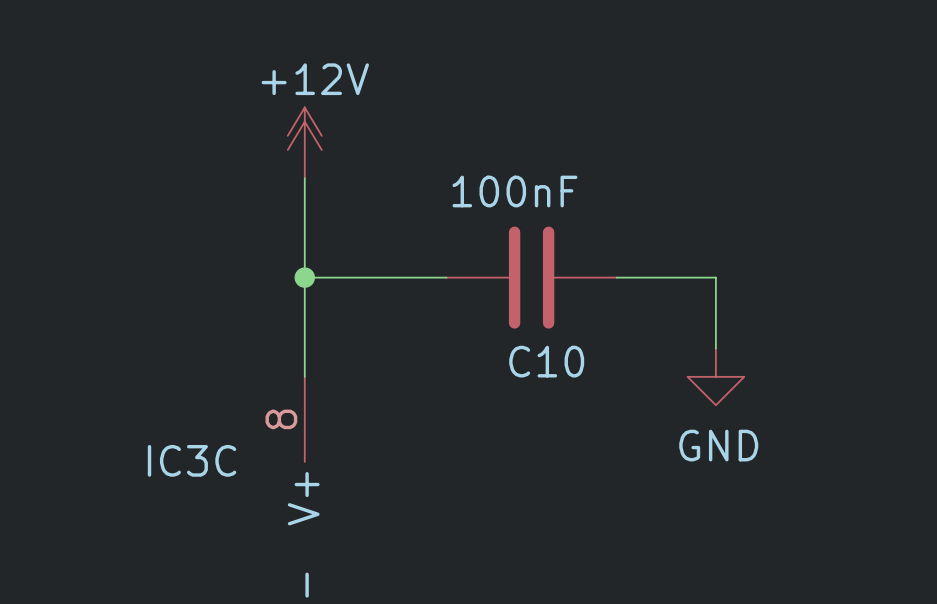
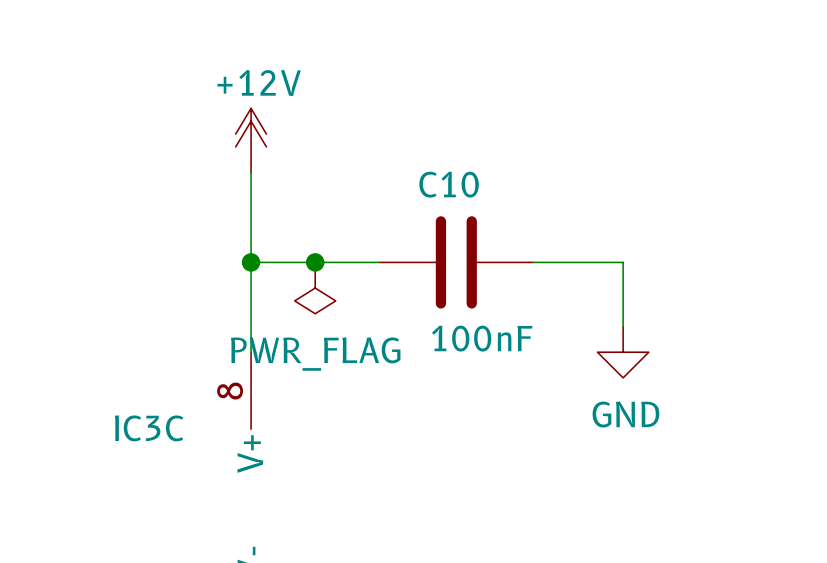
C10 value position: 100nF (514, 191) -> 100nF (482, 338)
junction: none -> (315, 262)
power symbol: none -> PWR_FLAG (315, 288)
C10 name position: C10 (546, 361) -> C10 (449, 184)

